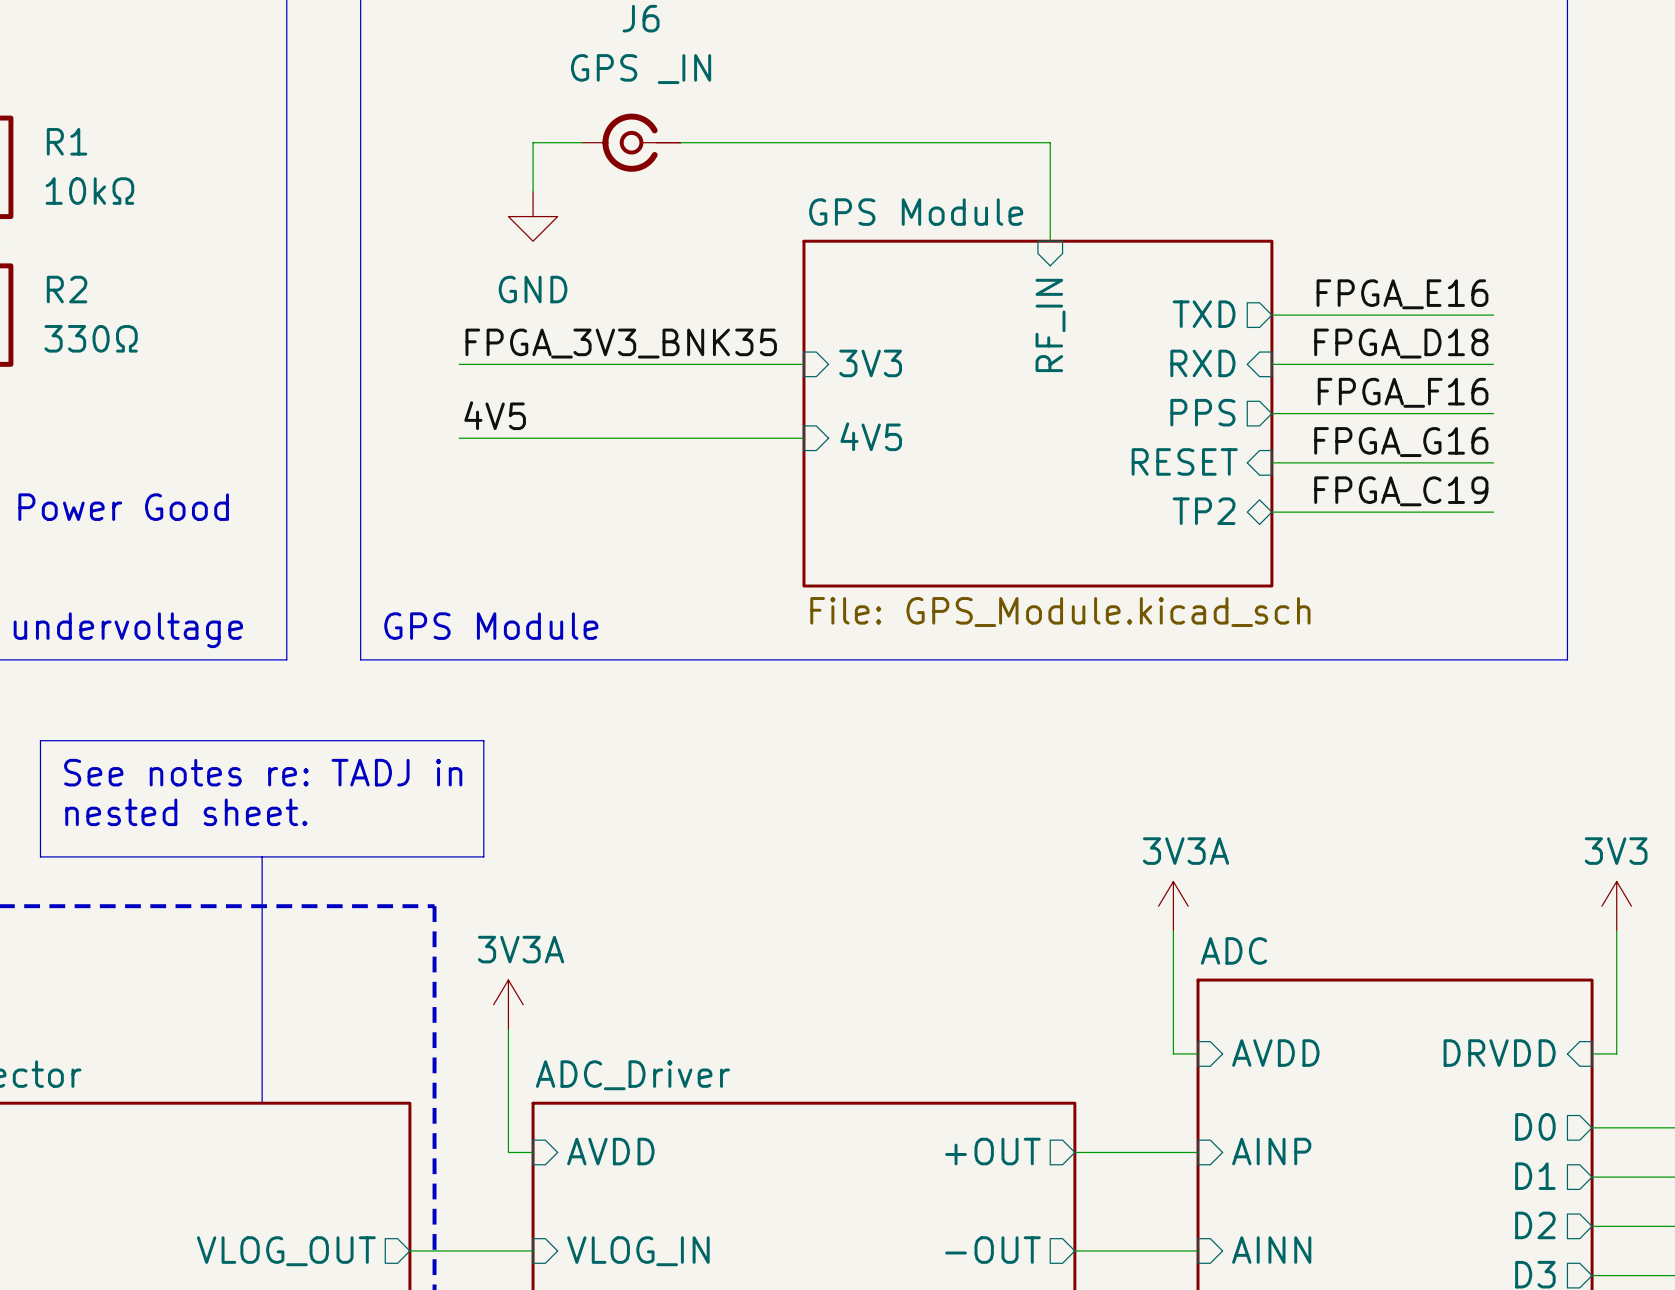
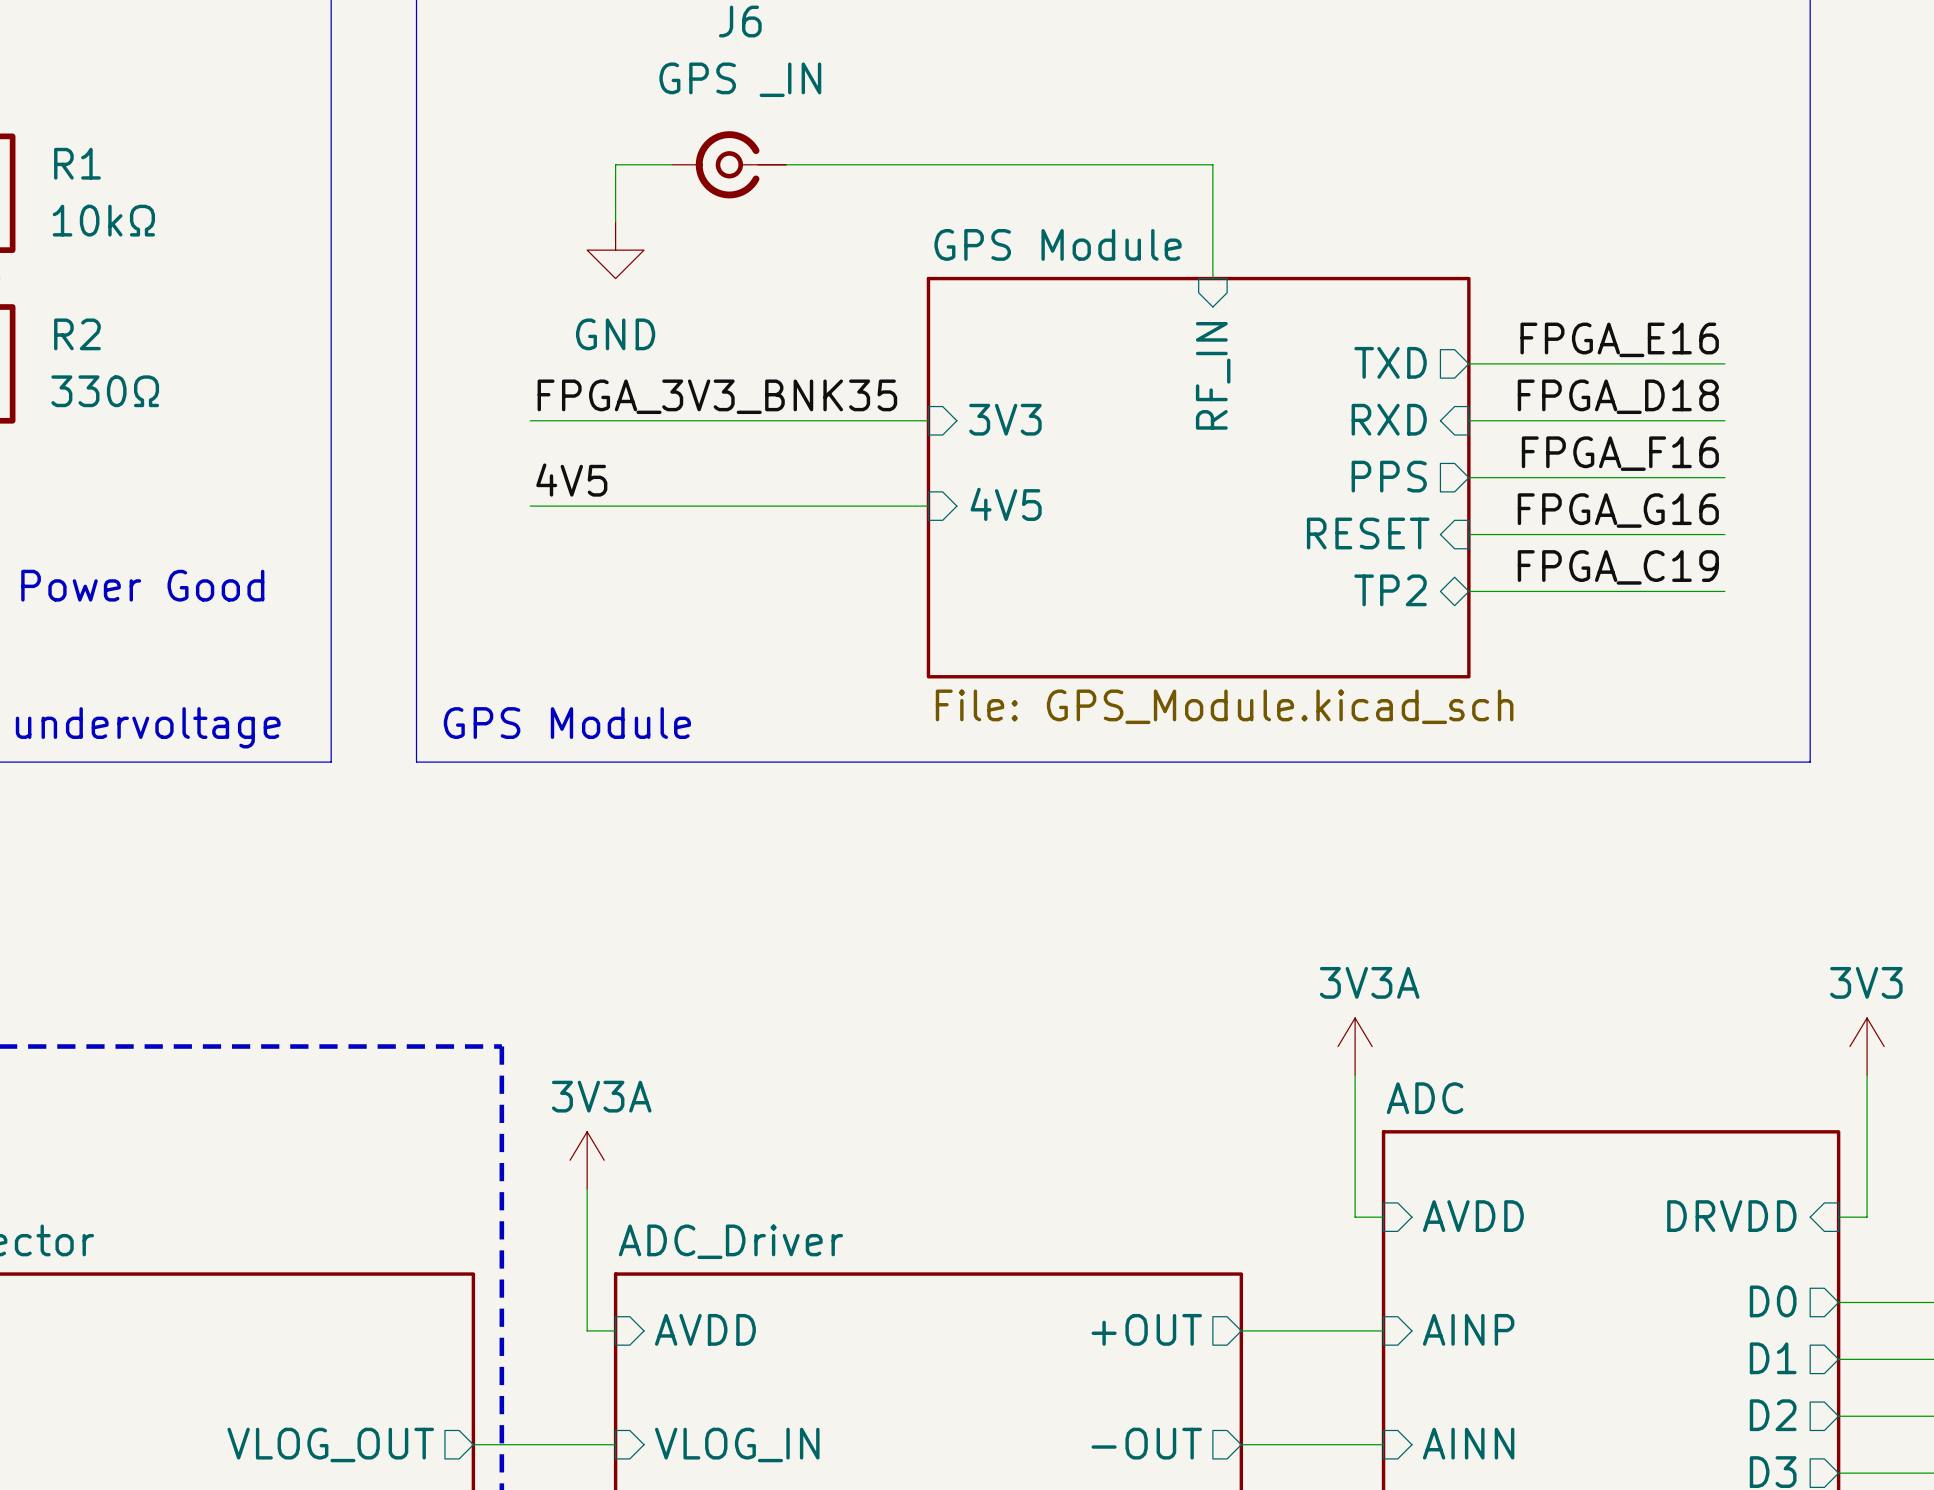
line: (40, 740) (483, 740) (483, 856) (40, 856) (40, 740) -> none
text: See notes re: TADJ in (263, 772) -> none
text: nested sheet. (186, 812) -> none
line: (262, 856) (262, 1103) -> none

